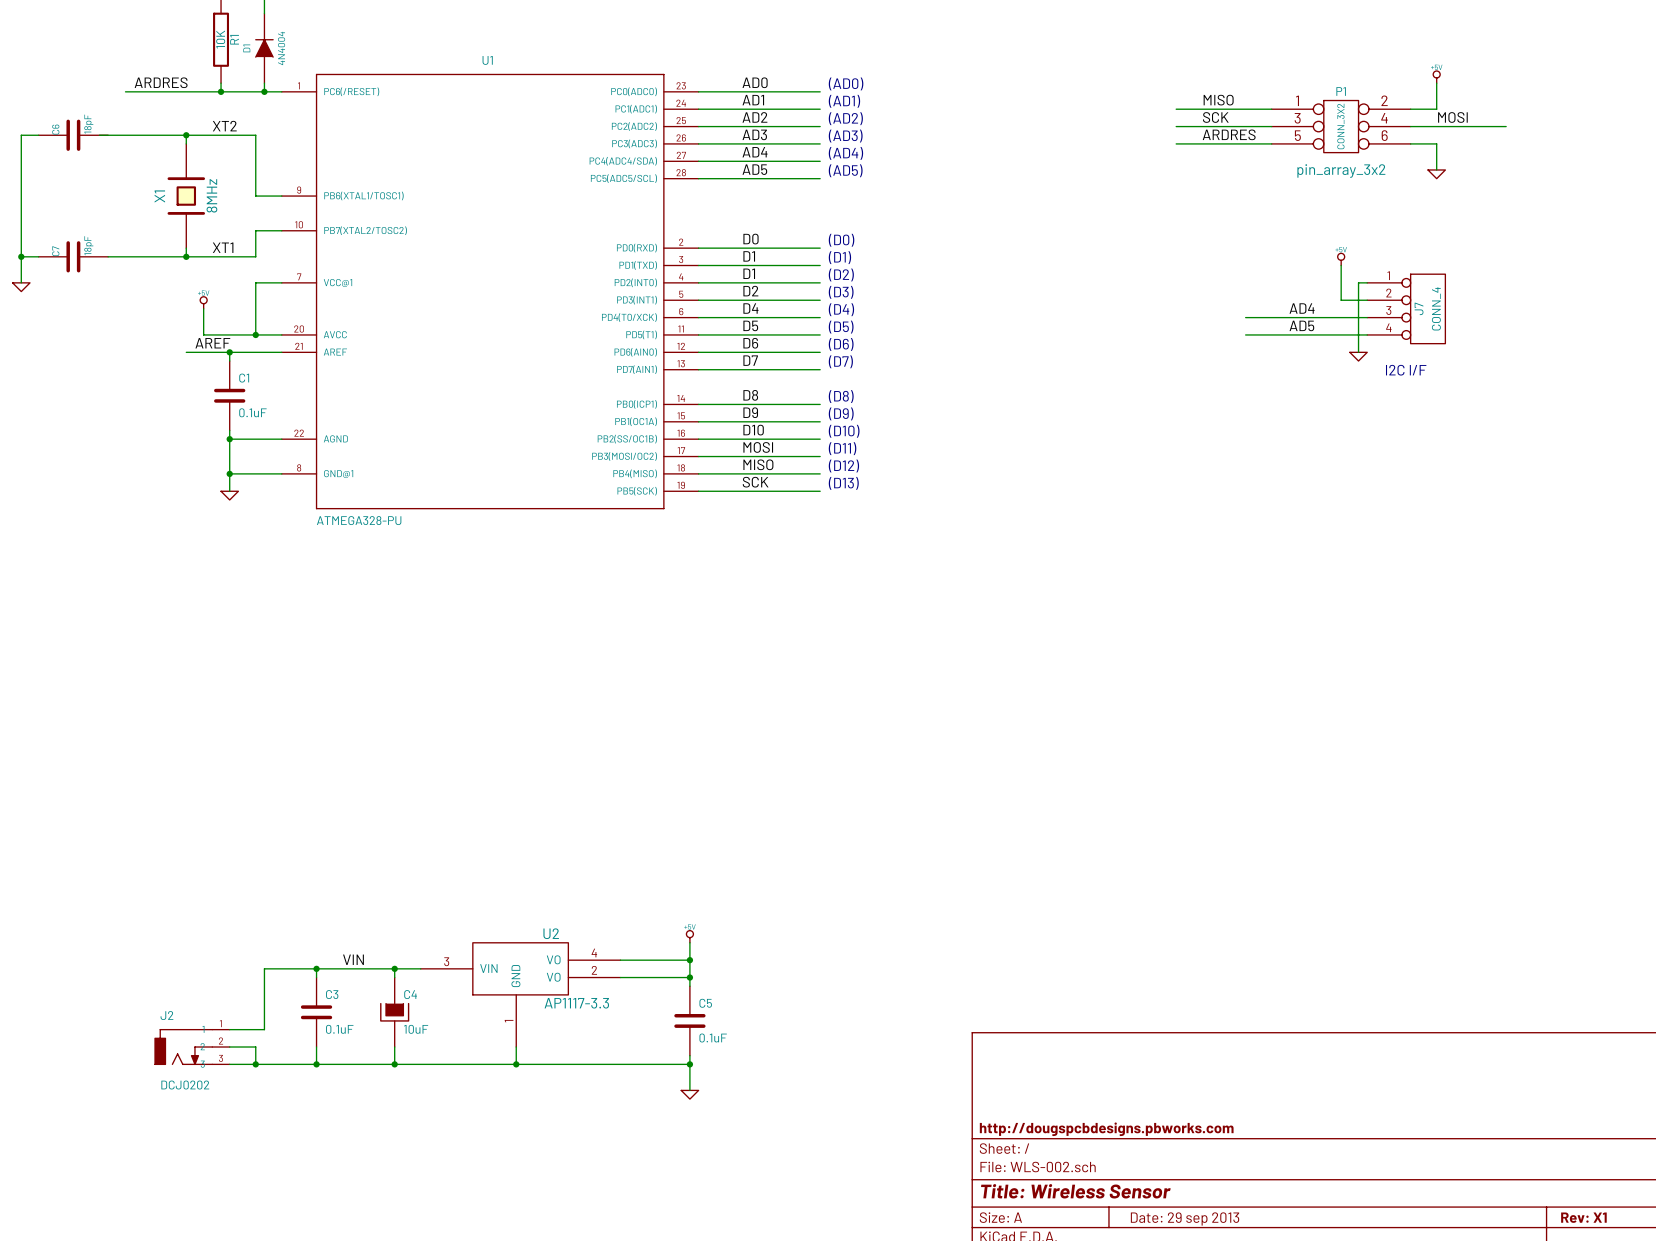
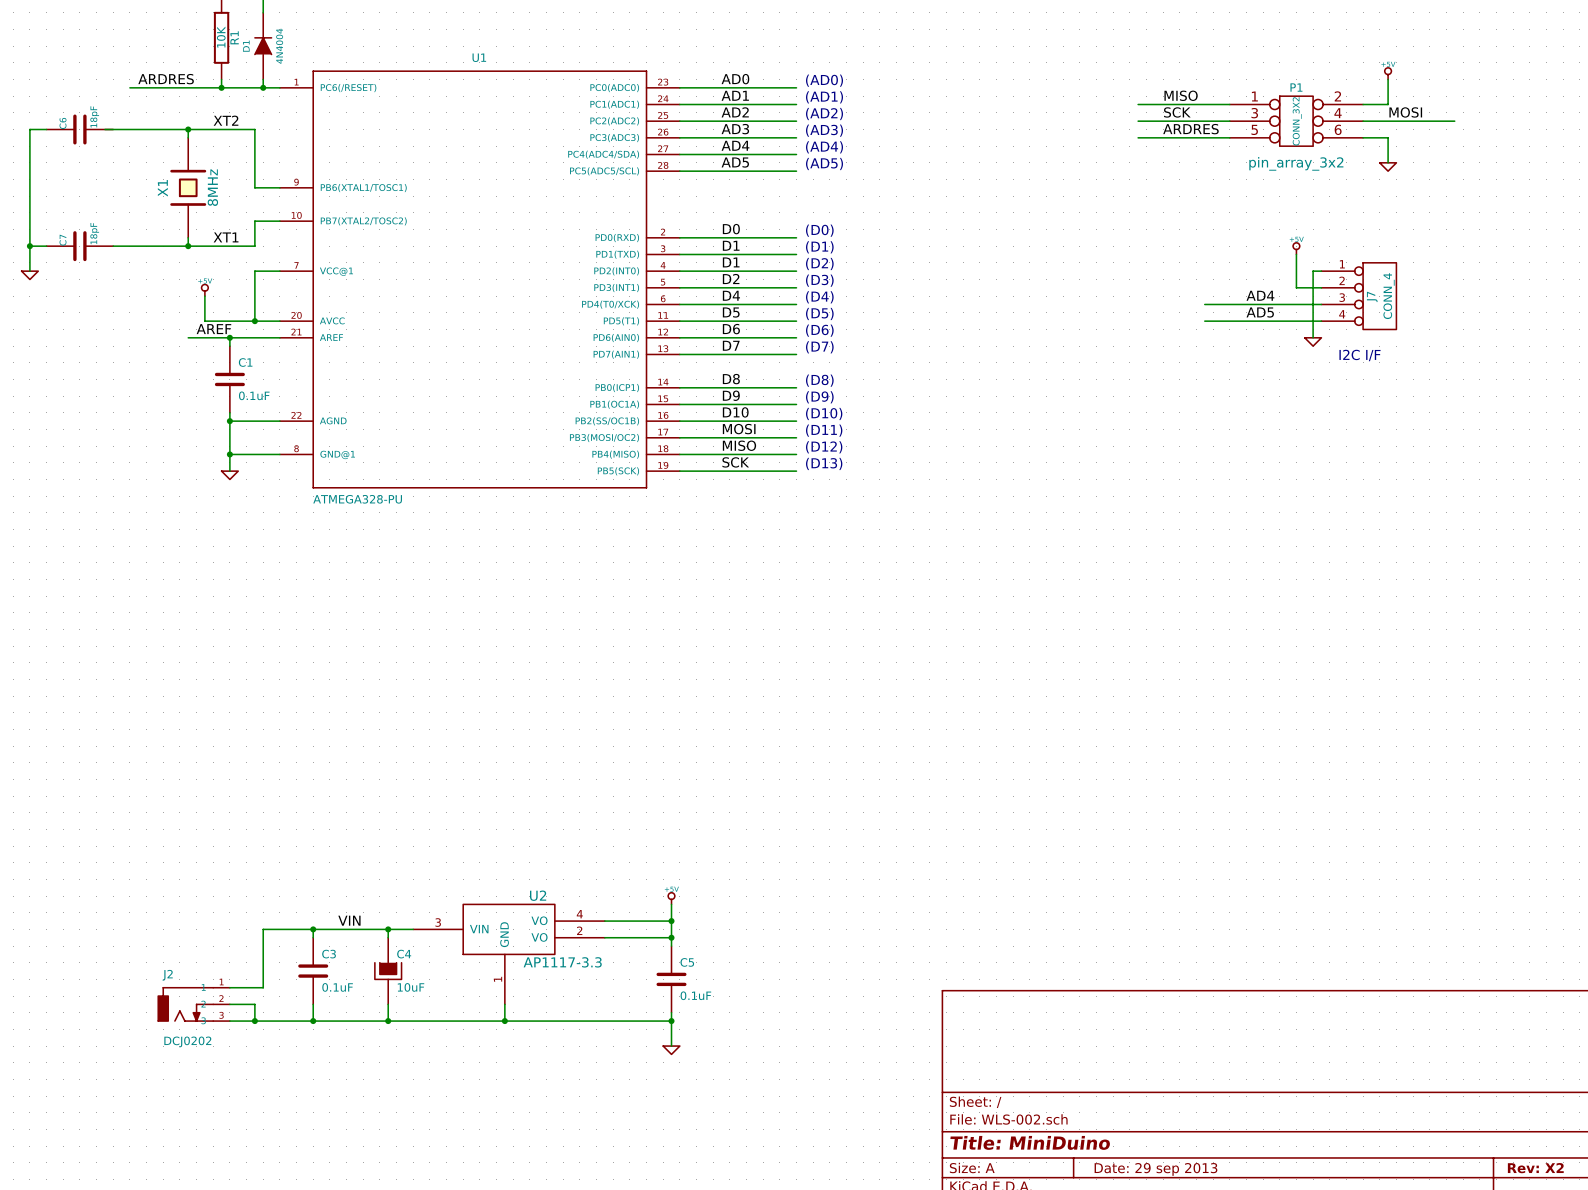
title block: http://dougspcbdesigns.pbworks.com (1106, 1129) -> none
title block: Title: Wireless Sensor (1075, 1191) -> Title: MiniDuino (1030, 1142)
title block: Rev: X1 (1583, 1217) -> Rev: X2 (1535, 1168)

